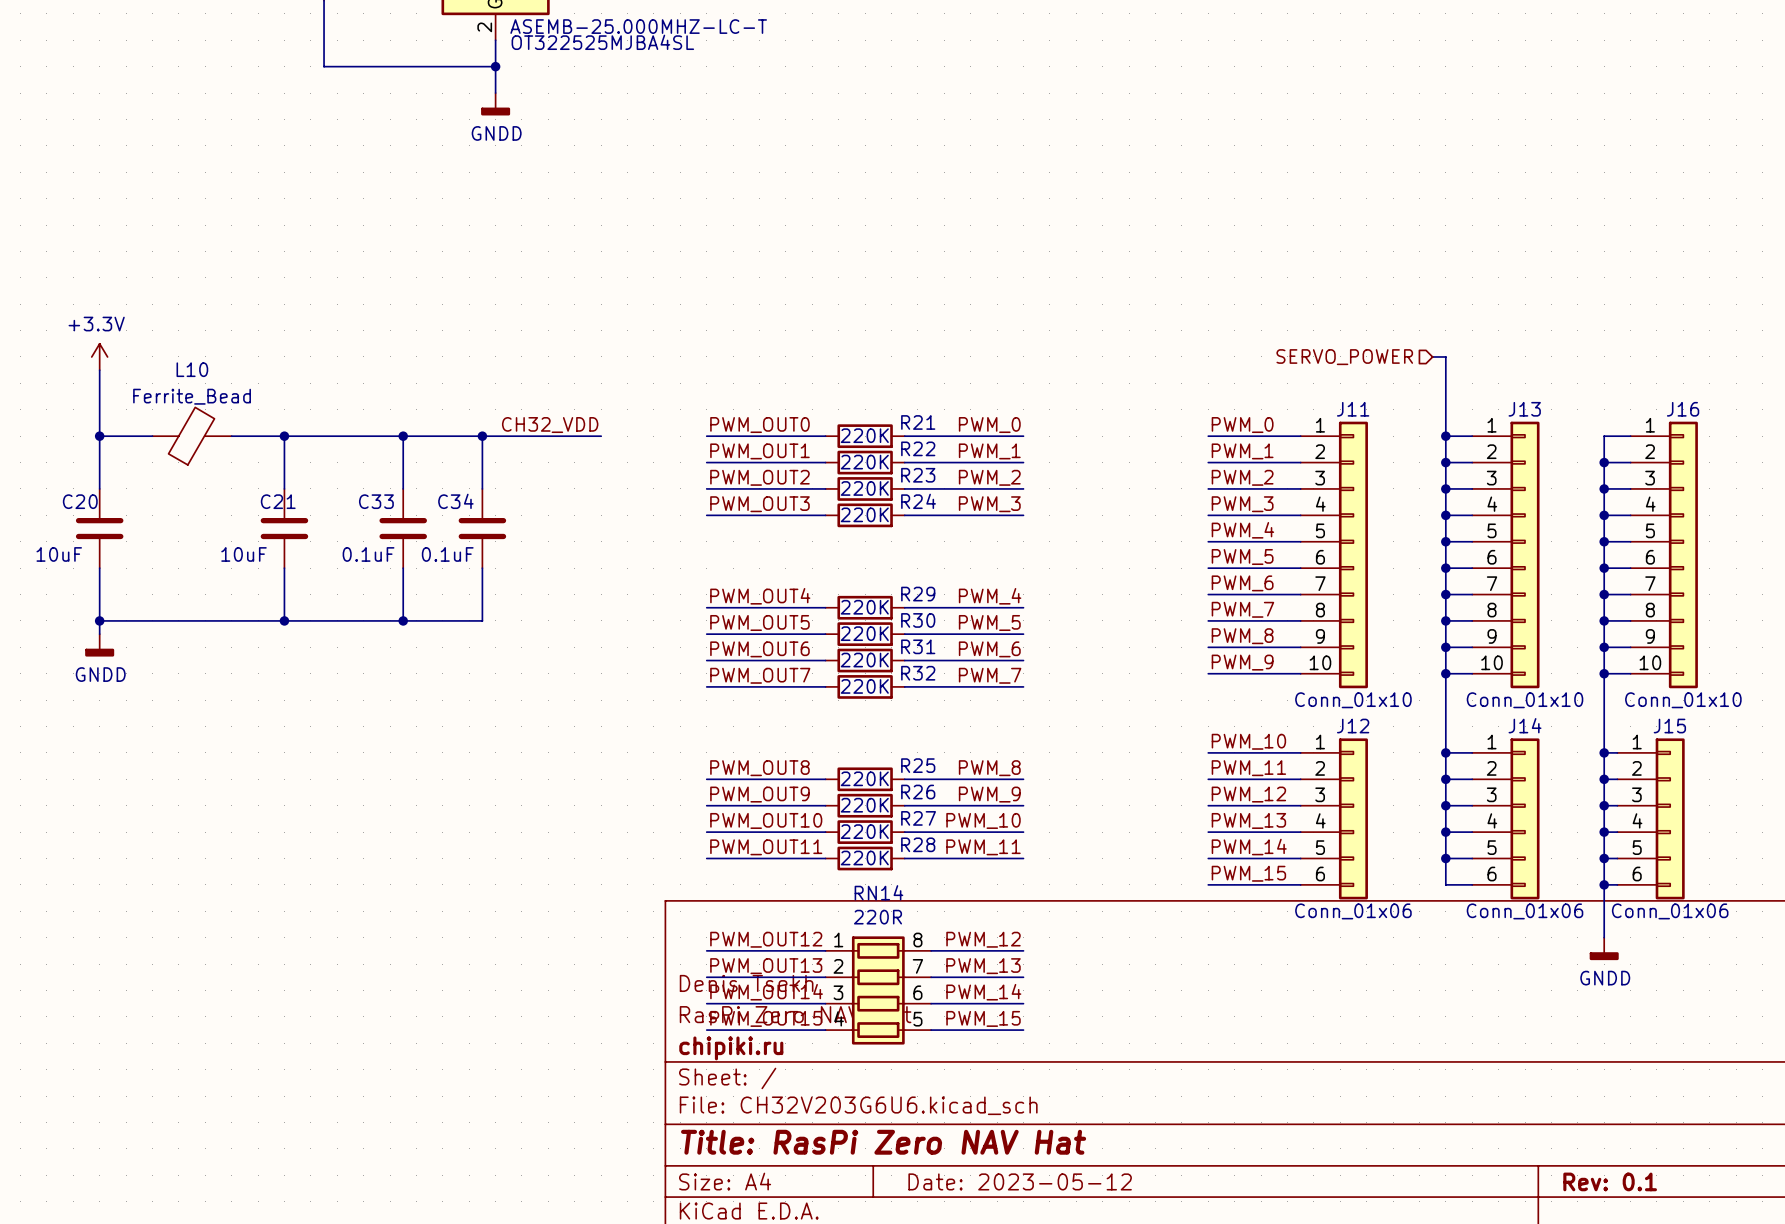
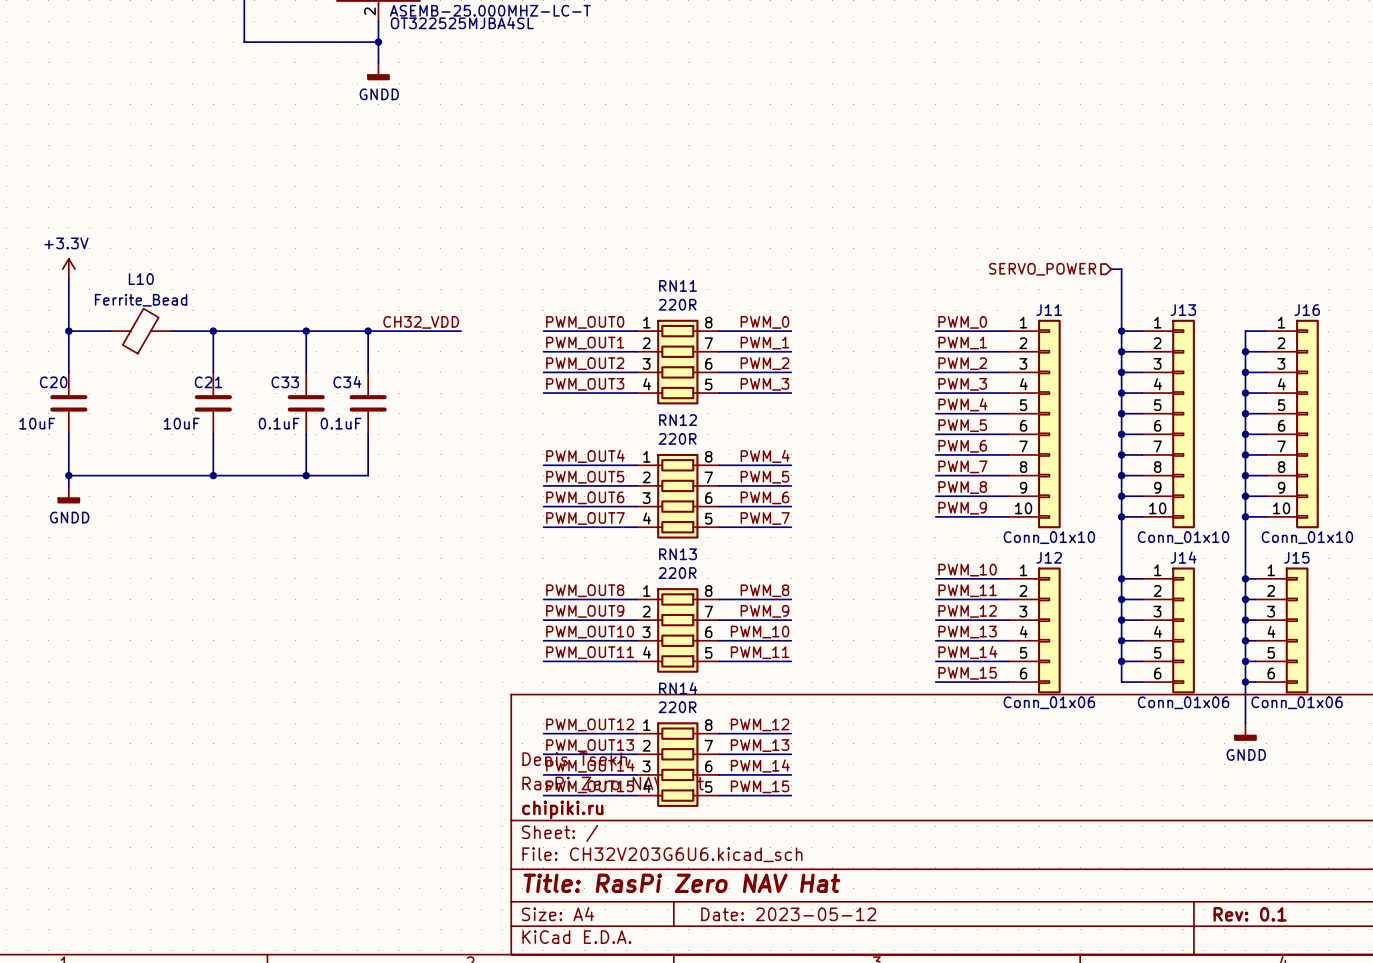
R21: 220К (865, 436) -> none
R22: 220К (865, 462) -> none
RN11: none -> 220R (677, 362)
R23: 220К (865, 488) -> none
R24: 220К (865, 515) -> none
R29: 220К (865, 607) -> none
R30: 220К (865, 634) -> none
RN12: none -> 220R (677, 496)
R31: 220К (865, 660) -> none
R32: 220К (865, 686) -> none
R25: 220К (865, 779) -> none
R26: 220К (865, 805) -> none
RN13: none -> 220R (677, 630)
R27: 220К (865, 832) -> none
R28: 220К (865, 858) -> none

